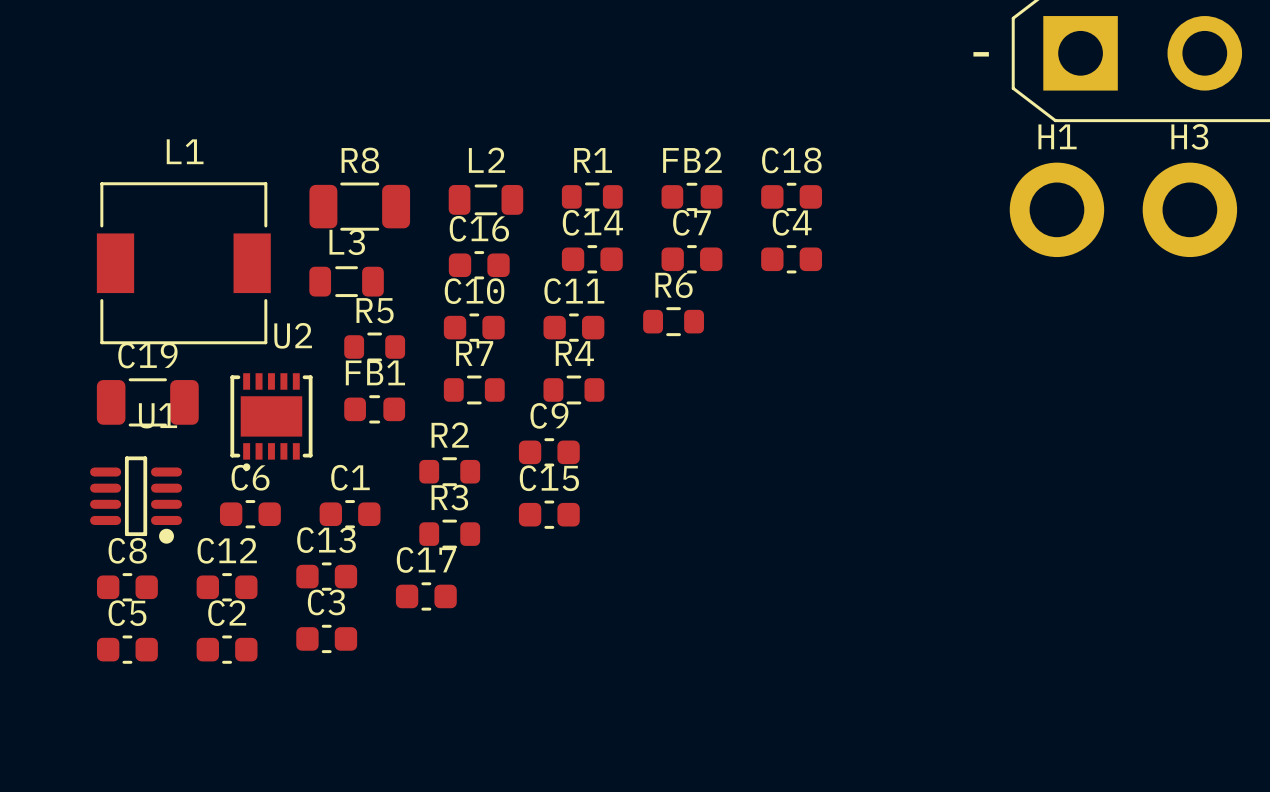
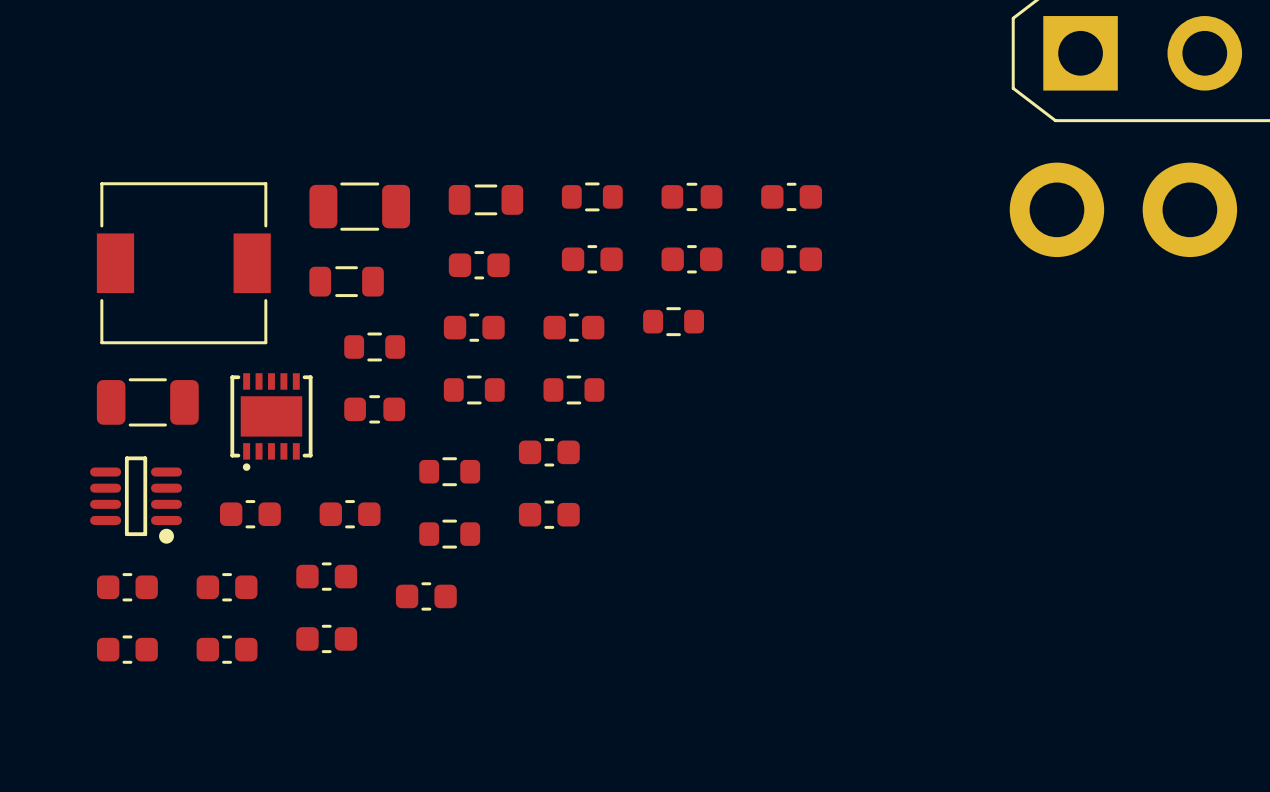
part text: - (981, 54) -> none
H1 name: H1 (1057, 136) -> none
H3 name: H3 (1189, 136) -> none
L1 name: L1 (185, 151) -> none
R8 name: R8 (360, 160) -> none
L2 name: L2 (486, 160) -> none
R1 name: R1 (593, 160) -> none
FB2 name: FB2 (692, 160) -> none
C18 name: C18 (791, 160) -> none
C14 name: C14 (592, 222) -> none
C7 name: C7 (691, 222) -> none
C4 name: C4 (792, 222) -> none
C16 name: C16 (479, 228) -> none
L3 name: L3 (347, 242) -> none
R6 name: R6 (674, 285) -> none
C10 name: C10 (474, 291) -> none
C11 name: C11 (574, 291) -> none
R5 name: R5 (375, 310) -> none
U2 name: U2 (293, 335) -> none
R7 name: R7 (474, 353) -> none
R4 name: R4 (574, 353) -> none
C19 name: C19 (147, 355) -> none
FB1 name: FB1 (375, 372) -> none
U1 name: U1 (158, 415) -> none
C9 name: C9 (549, 415) -> none
R2 name: R2 (450, 435) -> none
C6 name: C6 (250, 477) -> none
C1 name: C1 (350, 477) -> none
C15 name: C15 (549, 478) -> none
R3 name: R3 (449, 497) -> none
C13 name: C13 (326, 540) -> none
C8 name: C8 (127, 550) -> none
C12 name: C12 (227, 550) -> none
C17 name: C17 (426, 559) -> none
C3 name: C3 (326, 602) -> none
C5 name: C5 (127, 613) -> none
C2 name: C2 (227, 613) -> none

